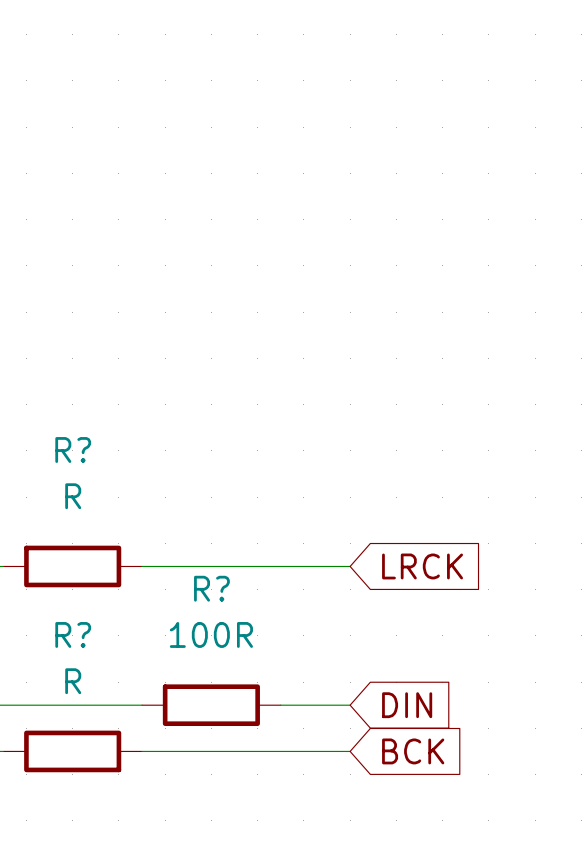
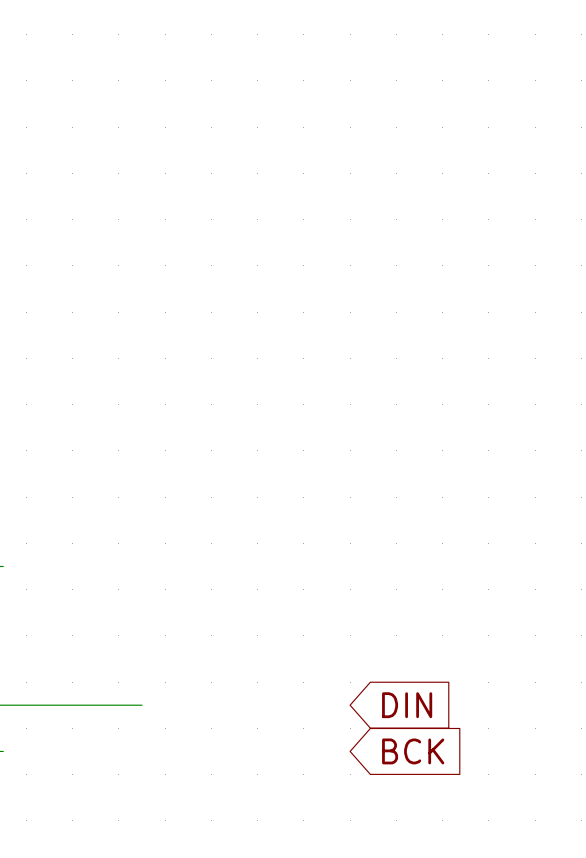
R?: R (72, 566) -> none
wire: (142, 566) (350, 566) -> none
global label: LRCK (422, 566) -> none
R?: 100R (211, 705) -> none
wire: (280, 705) (350, 705) -> none
R?: R (72, 751) -> none
wire: (142, 751) (350, 751) -> none

